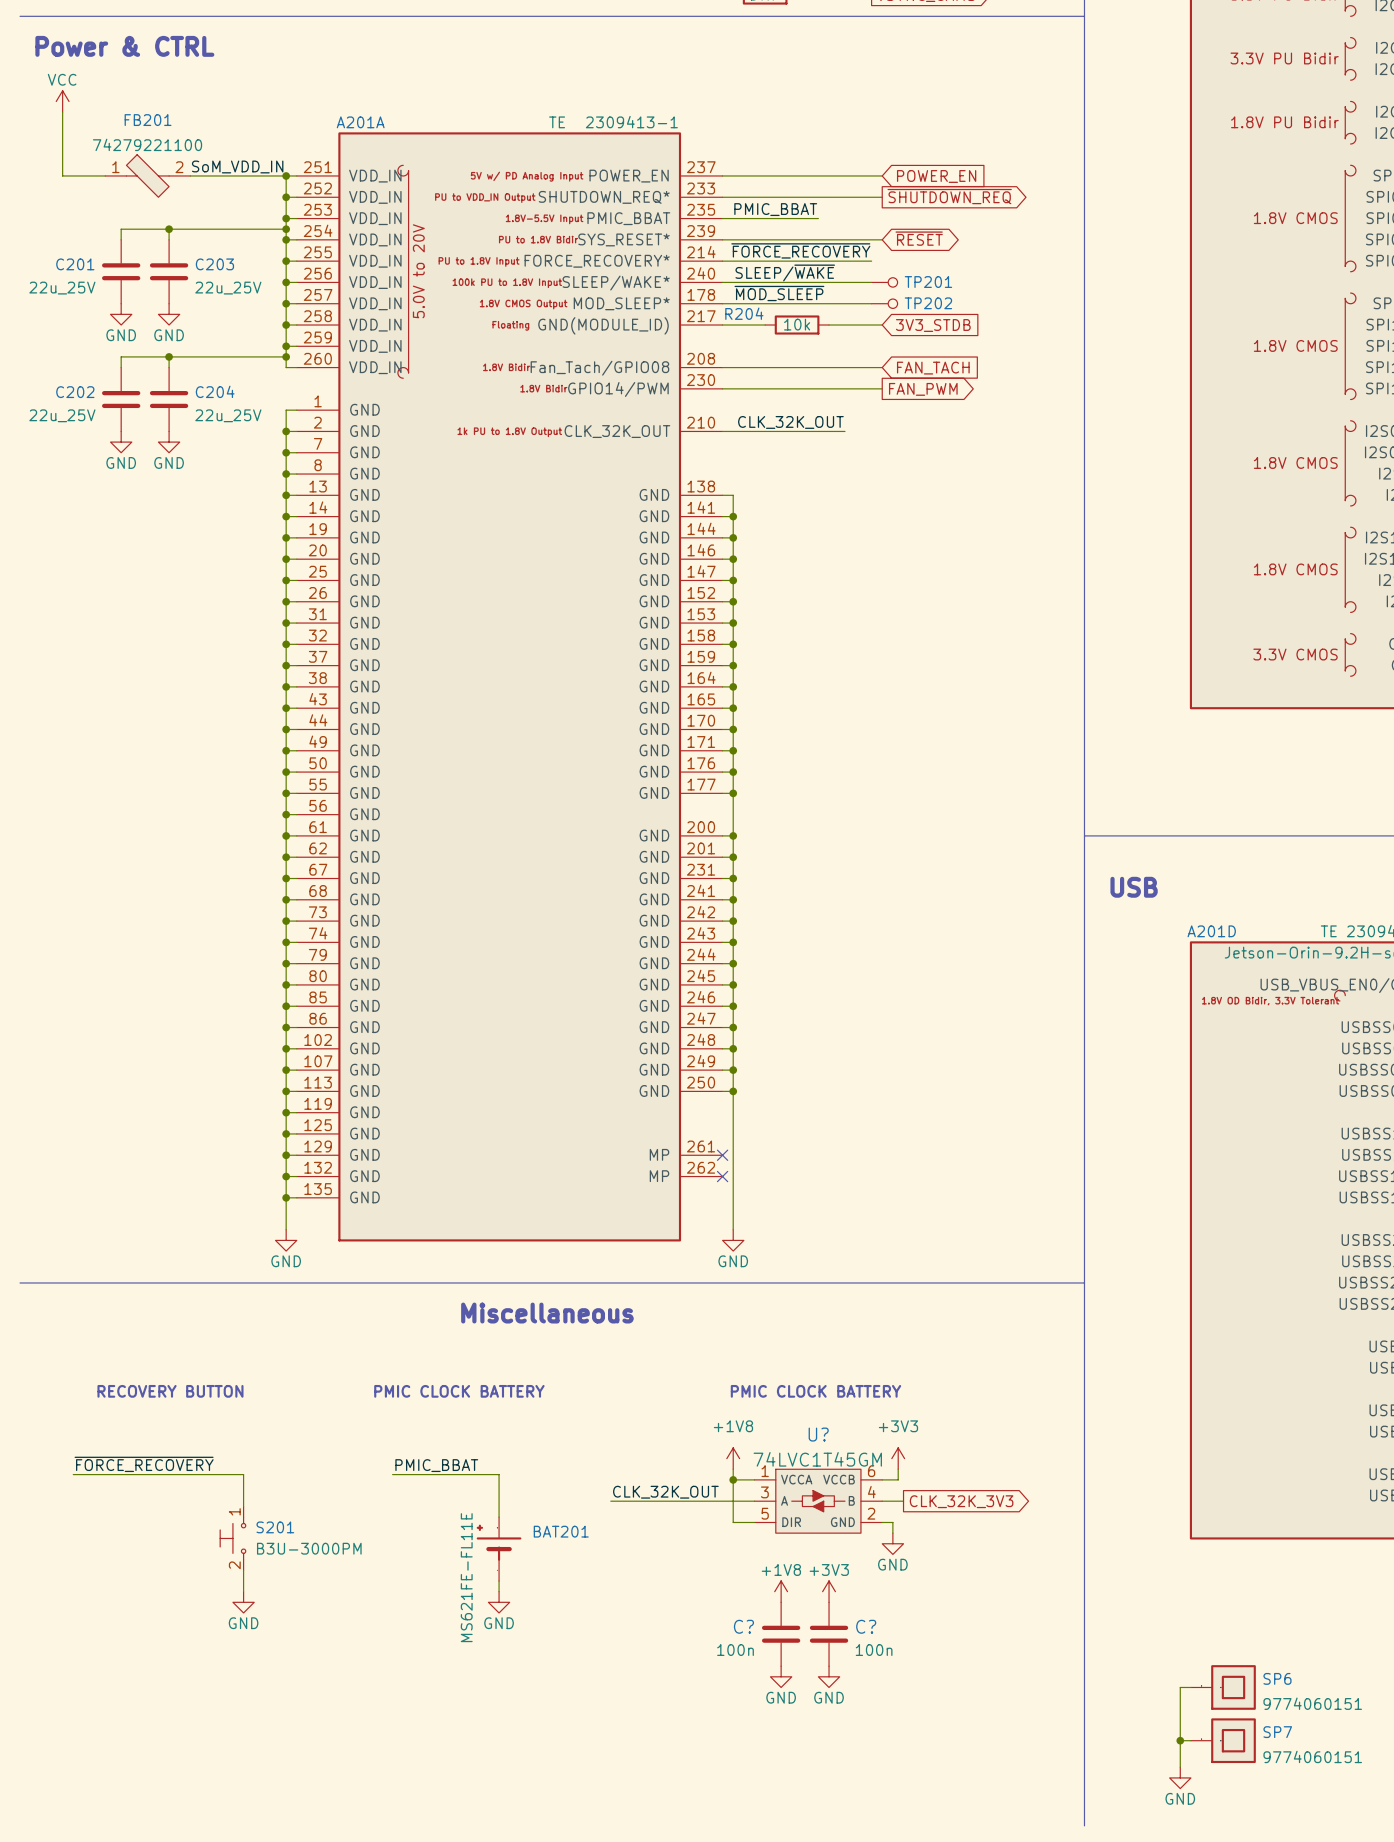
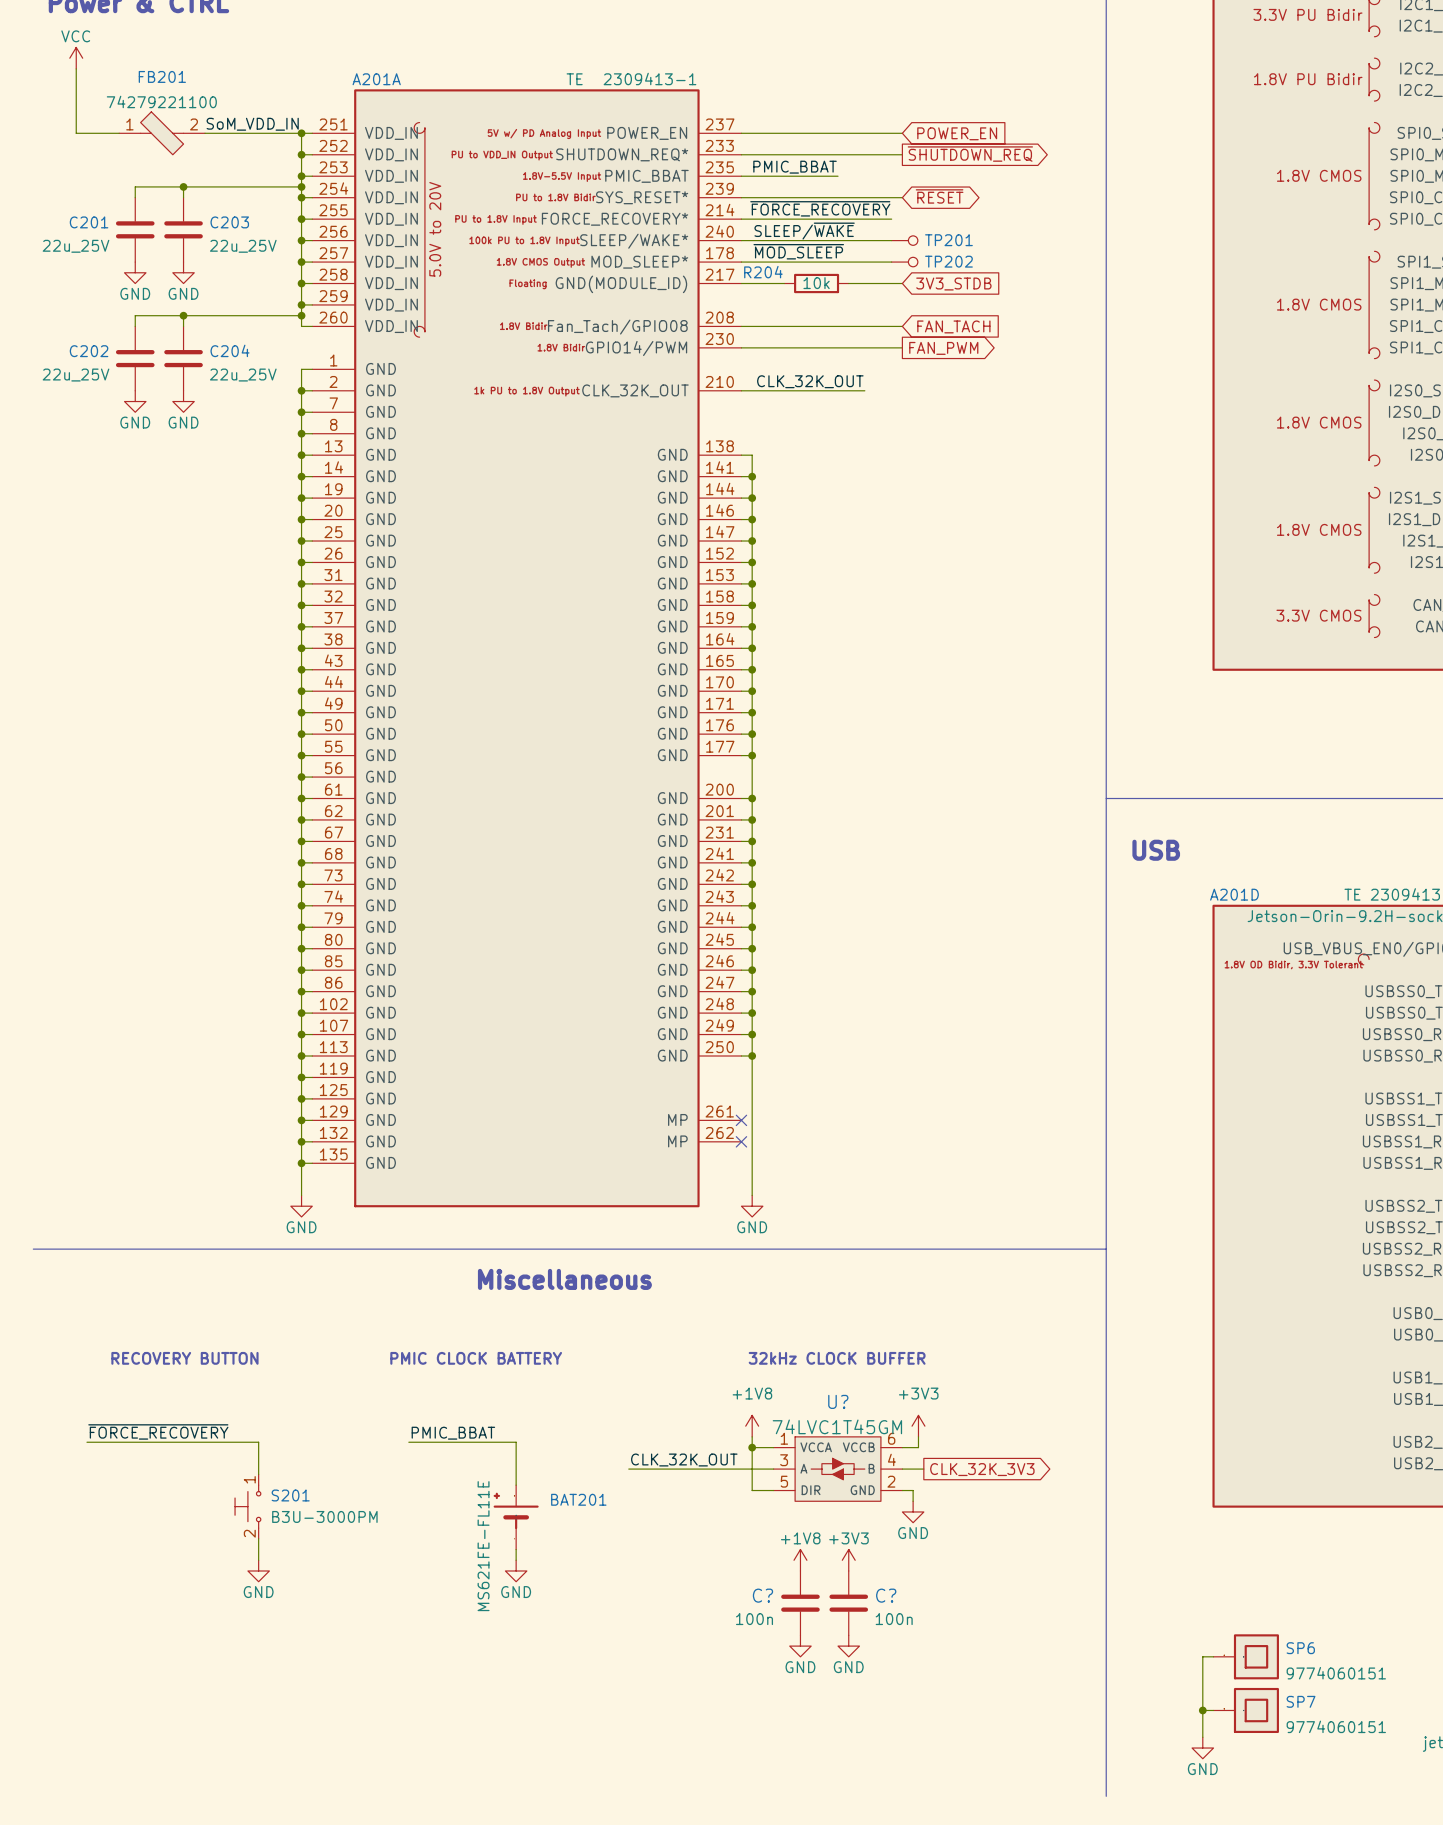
text: PMIC CLOCK BATTERY (815, 1391) -> 32kHz CLOCK BUFFER (837, 1358)

